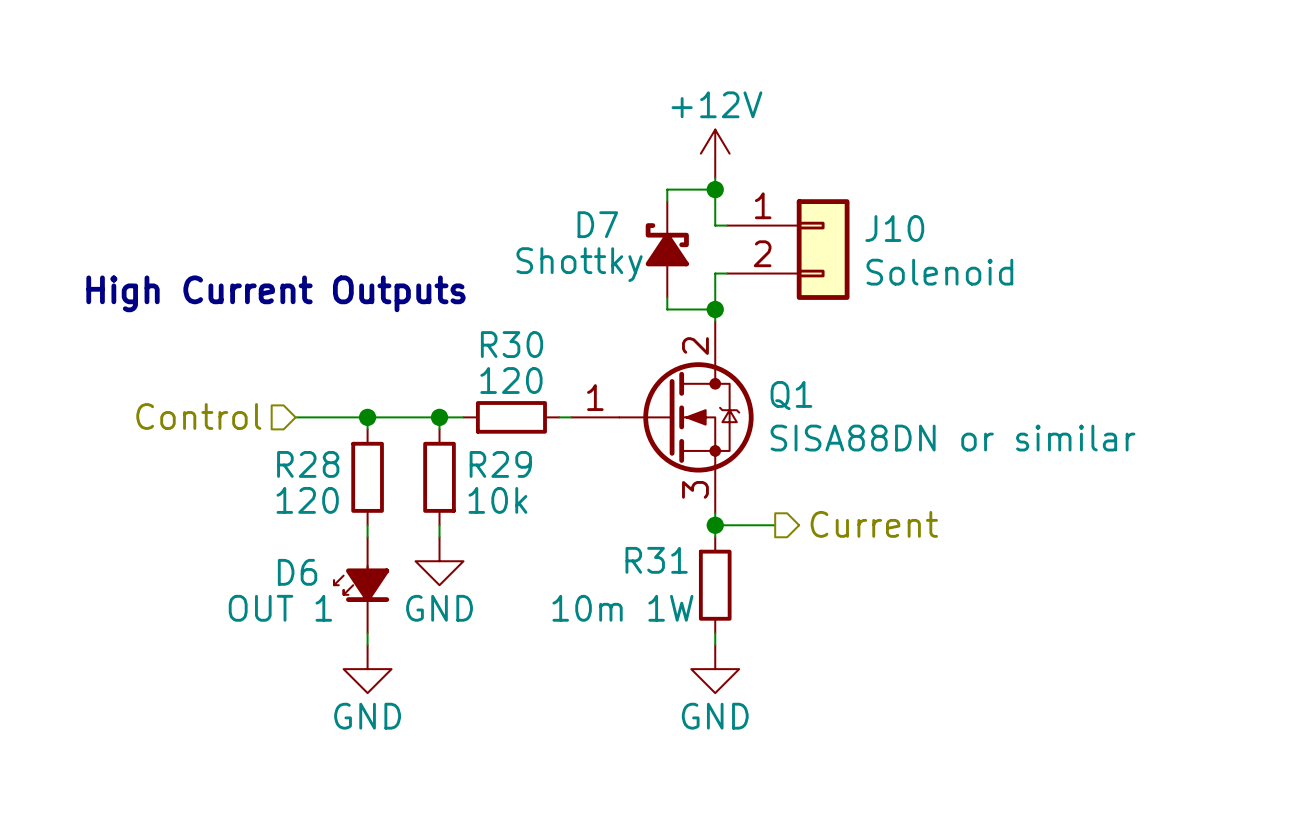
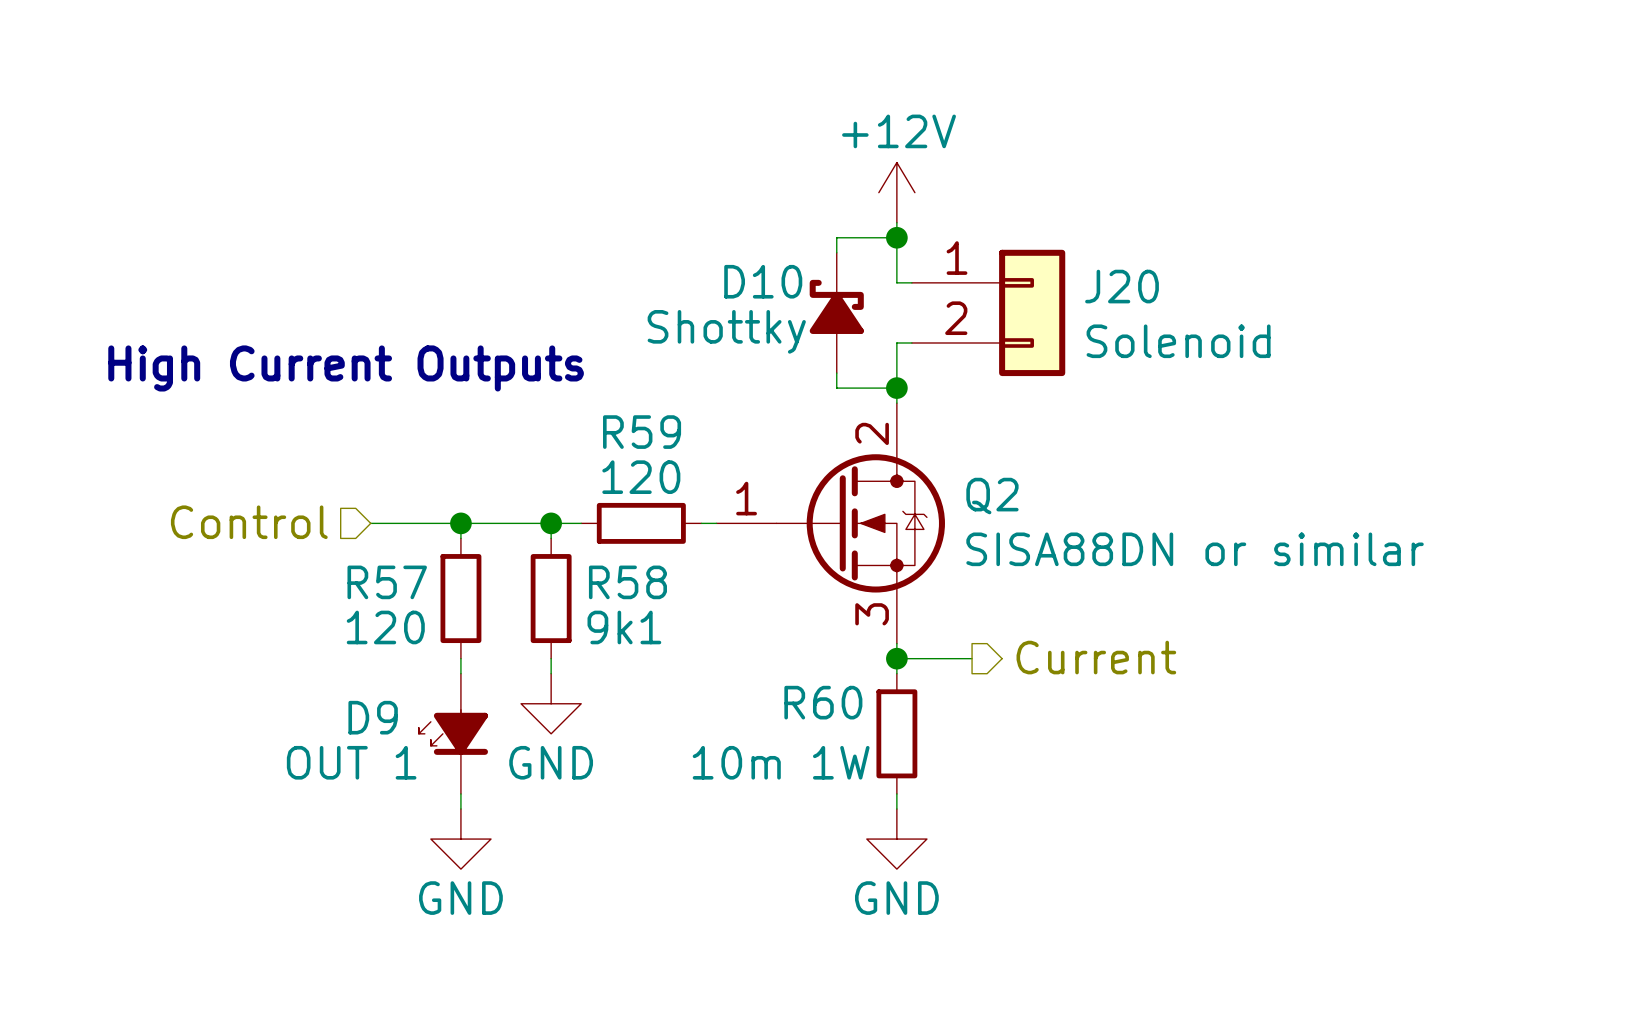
D7 name: D7 (597, 224) -> D10 (763, 281)
J10 name: J10 (894, 228) -> J20 (1122, 286)
R30 name: R30 (512, 344) -> R59 (642, 432)
Q1 name: Q1 (791, 395) -> Q2 (992, 496)
R28 name: R28 (308, 464) -> R57 (387, 582)
R29 name: R29 (500, 464) -> R58 (627, 582)
R29 value: 10k (497, 500) -> 9k1 (624, 627)
R31 name: R31 (656, 560) -> R60 (823, 702)
D6 name: D6 (297, 572) -> D9 (373, 717)

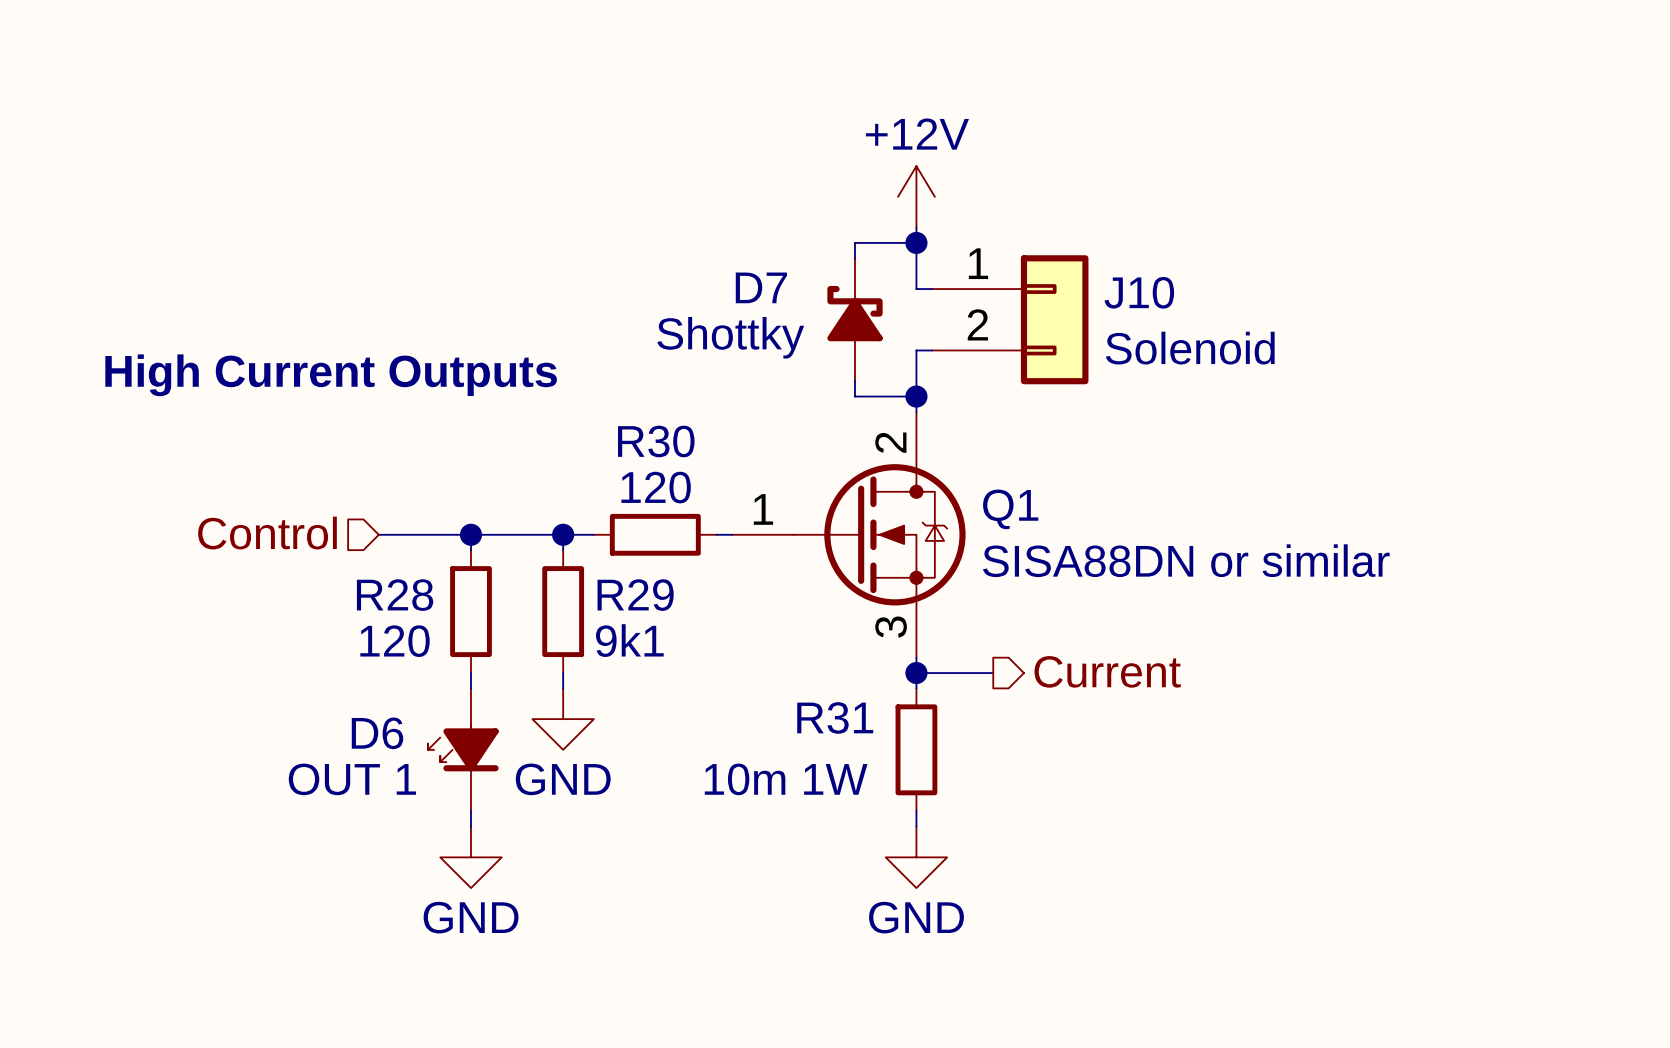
D10 name: D10 (763, 281) -> D7 (761, 287)
J20 name: J20 (1122, 286) -> J10 (1139, 292)
R59 name: R59 (642, 432) -> R30 (656, 441)
Q2 name: Q2 (992, 496) -> Q1 (1010, 509)
R57 name: R57 (387, 582) -> R28 (395, 595)
R58 name: R58 (627, 582) -> R29 (635, 595)
R60 name: R60 (823, 702) -> R31 (835, 717)
D9 name: D9 (373, 717) -> D6 (377, 733)

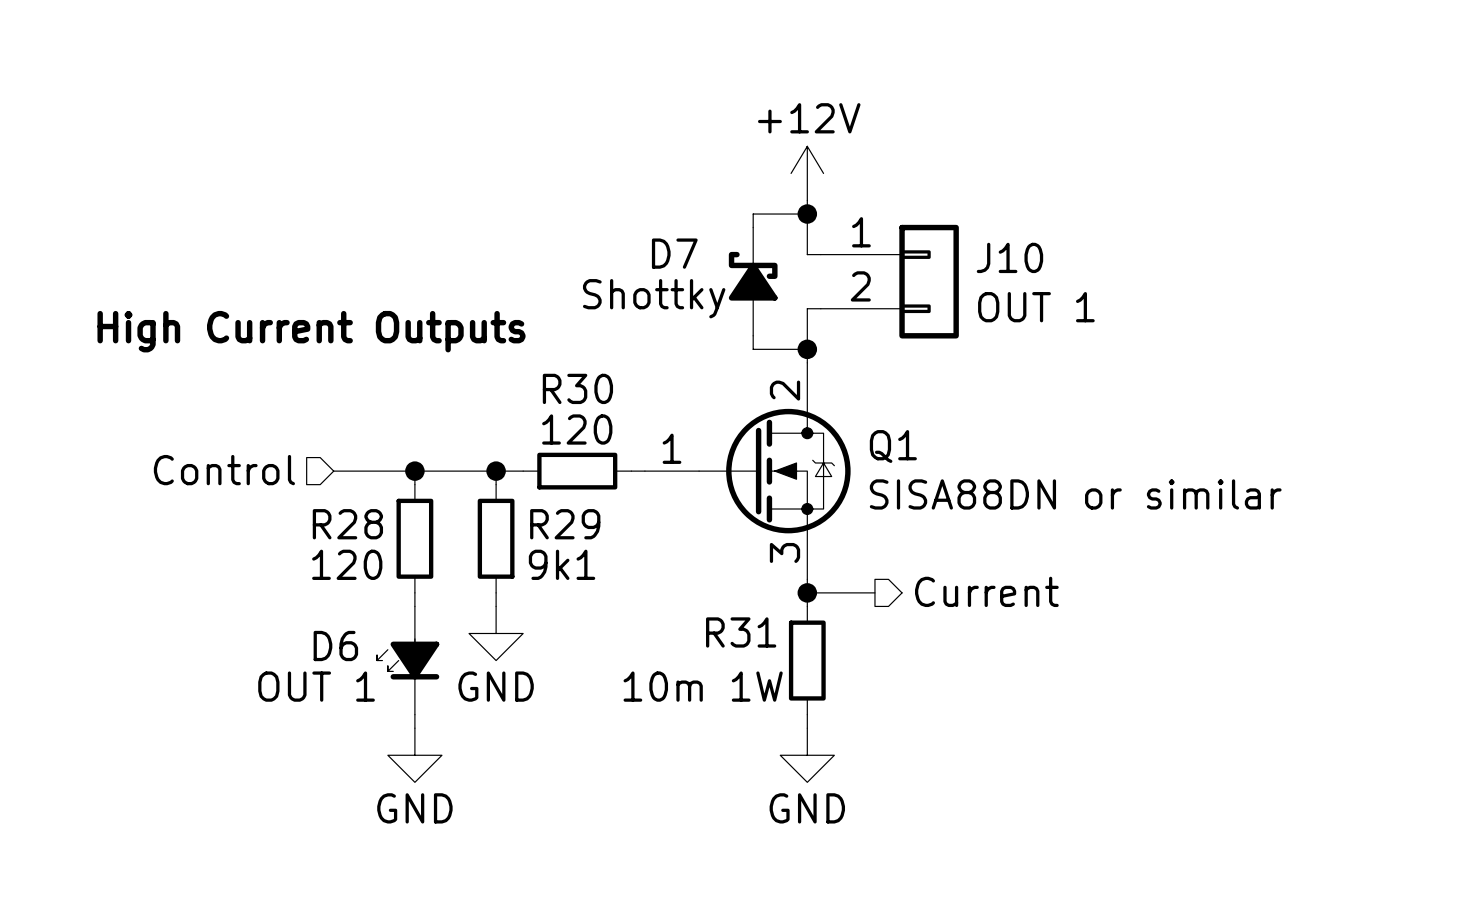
J10 value: Solenoid (1190, 348) -> OUT 1 (1036, 307)

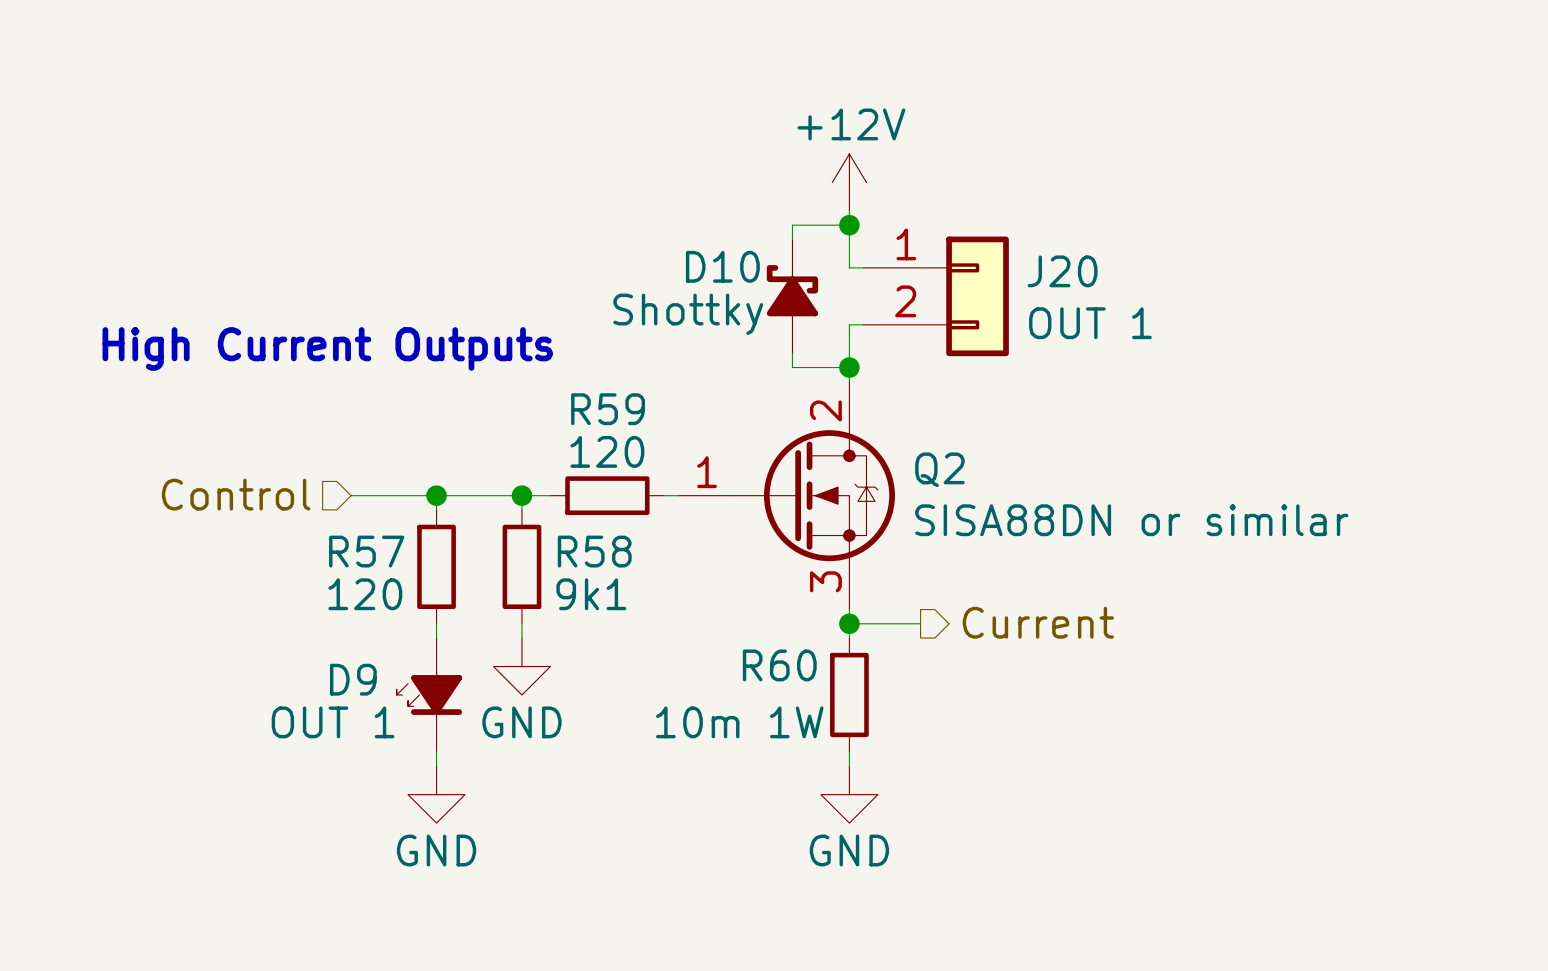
D7 name: D7 (674, 253) -> D10 (722, 266)
J10 name: J10 (1009, 257) -> J20 (1062, 271)
R30 name: R30 (577, 388) -> R59 (608, 409)
Q1 name: Q1 (893, 446) -> Q2 (939, 469)
R28 name: R28 (347, 524) -> R57 (366, 551)
R29 name: R29 (565, 524) -> R58 (594, 551)
R31 name: R31 (741, 632) -> R60 (779, 665)
D6 name: D6 (335, 646) -> D9 (353, 679)

